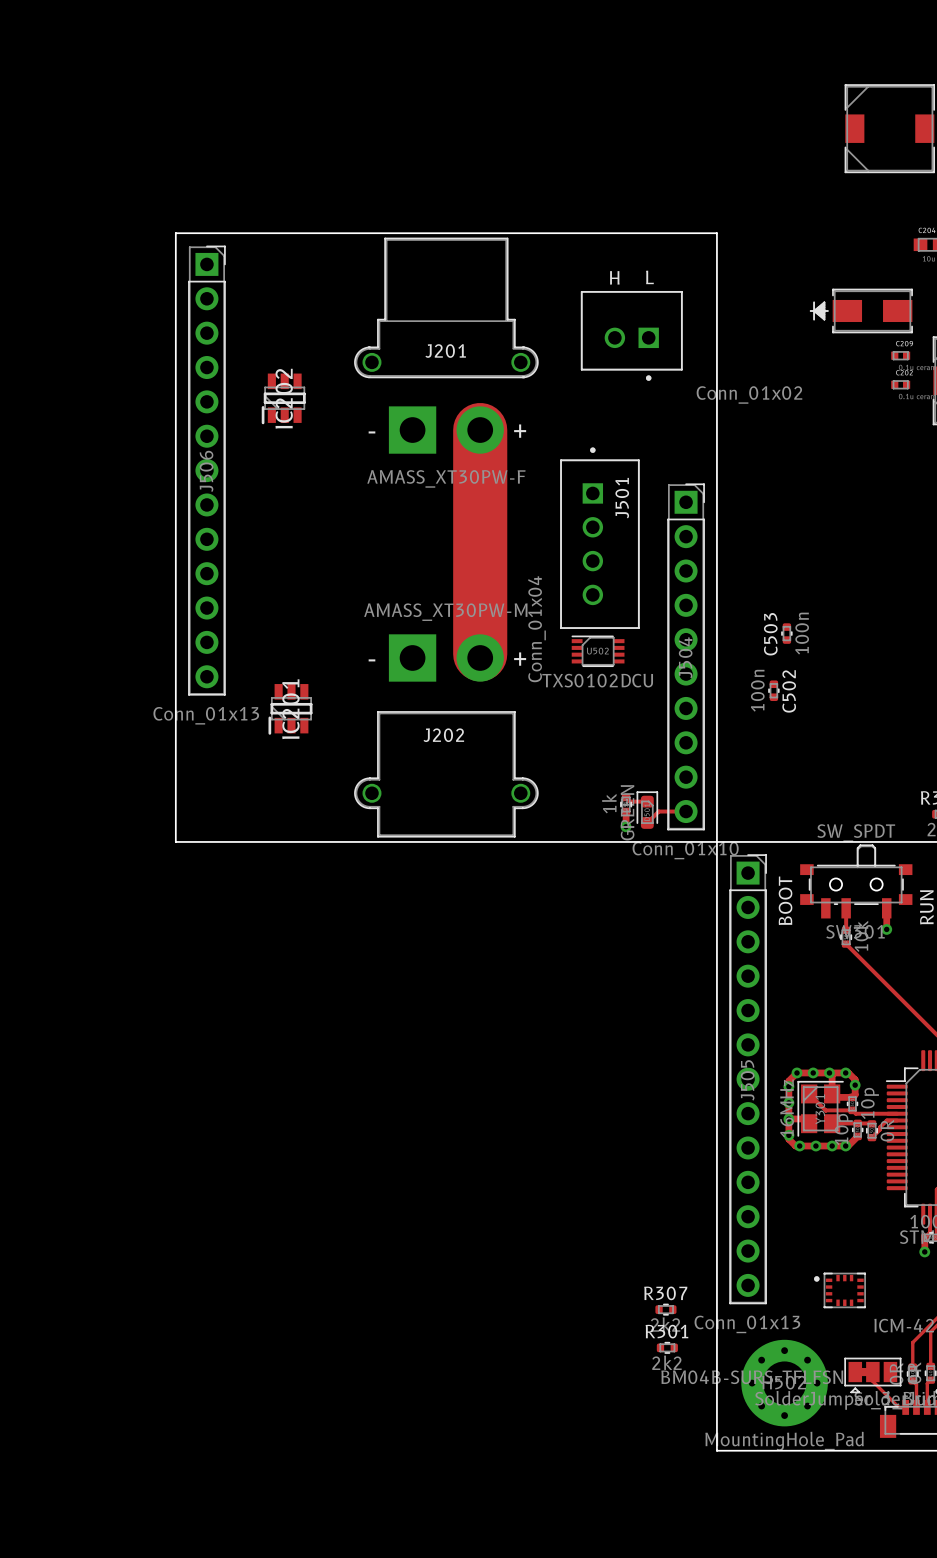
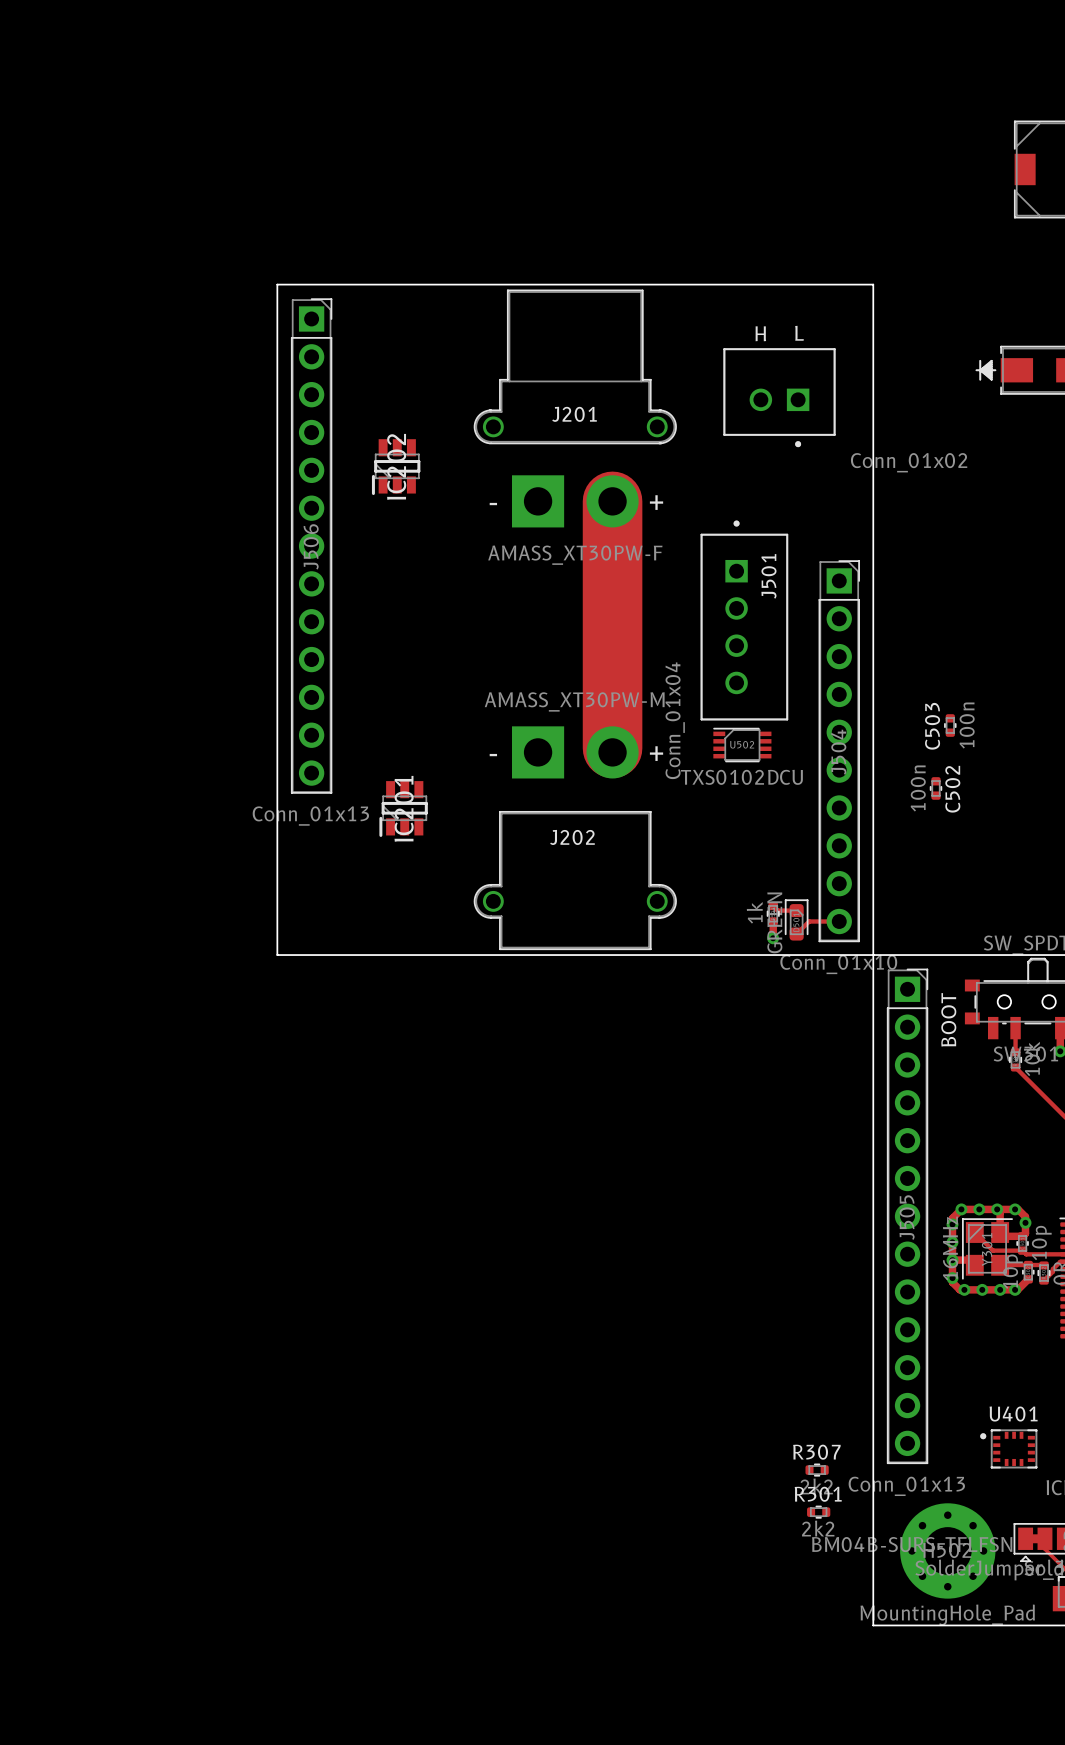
U401 name: none -> U401 (1013, 1414)

